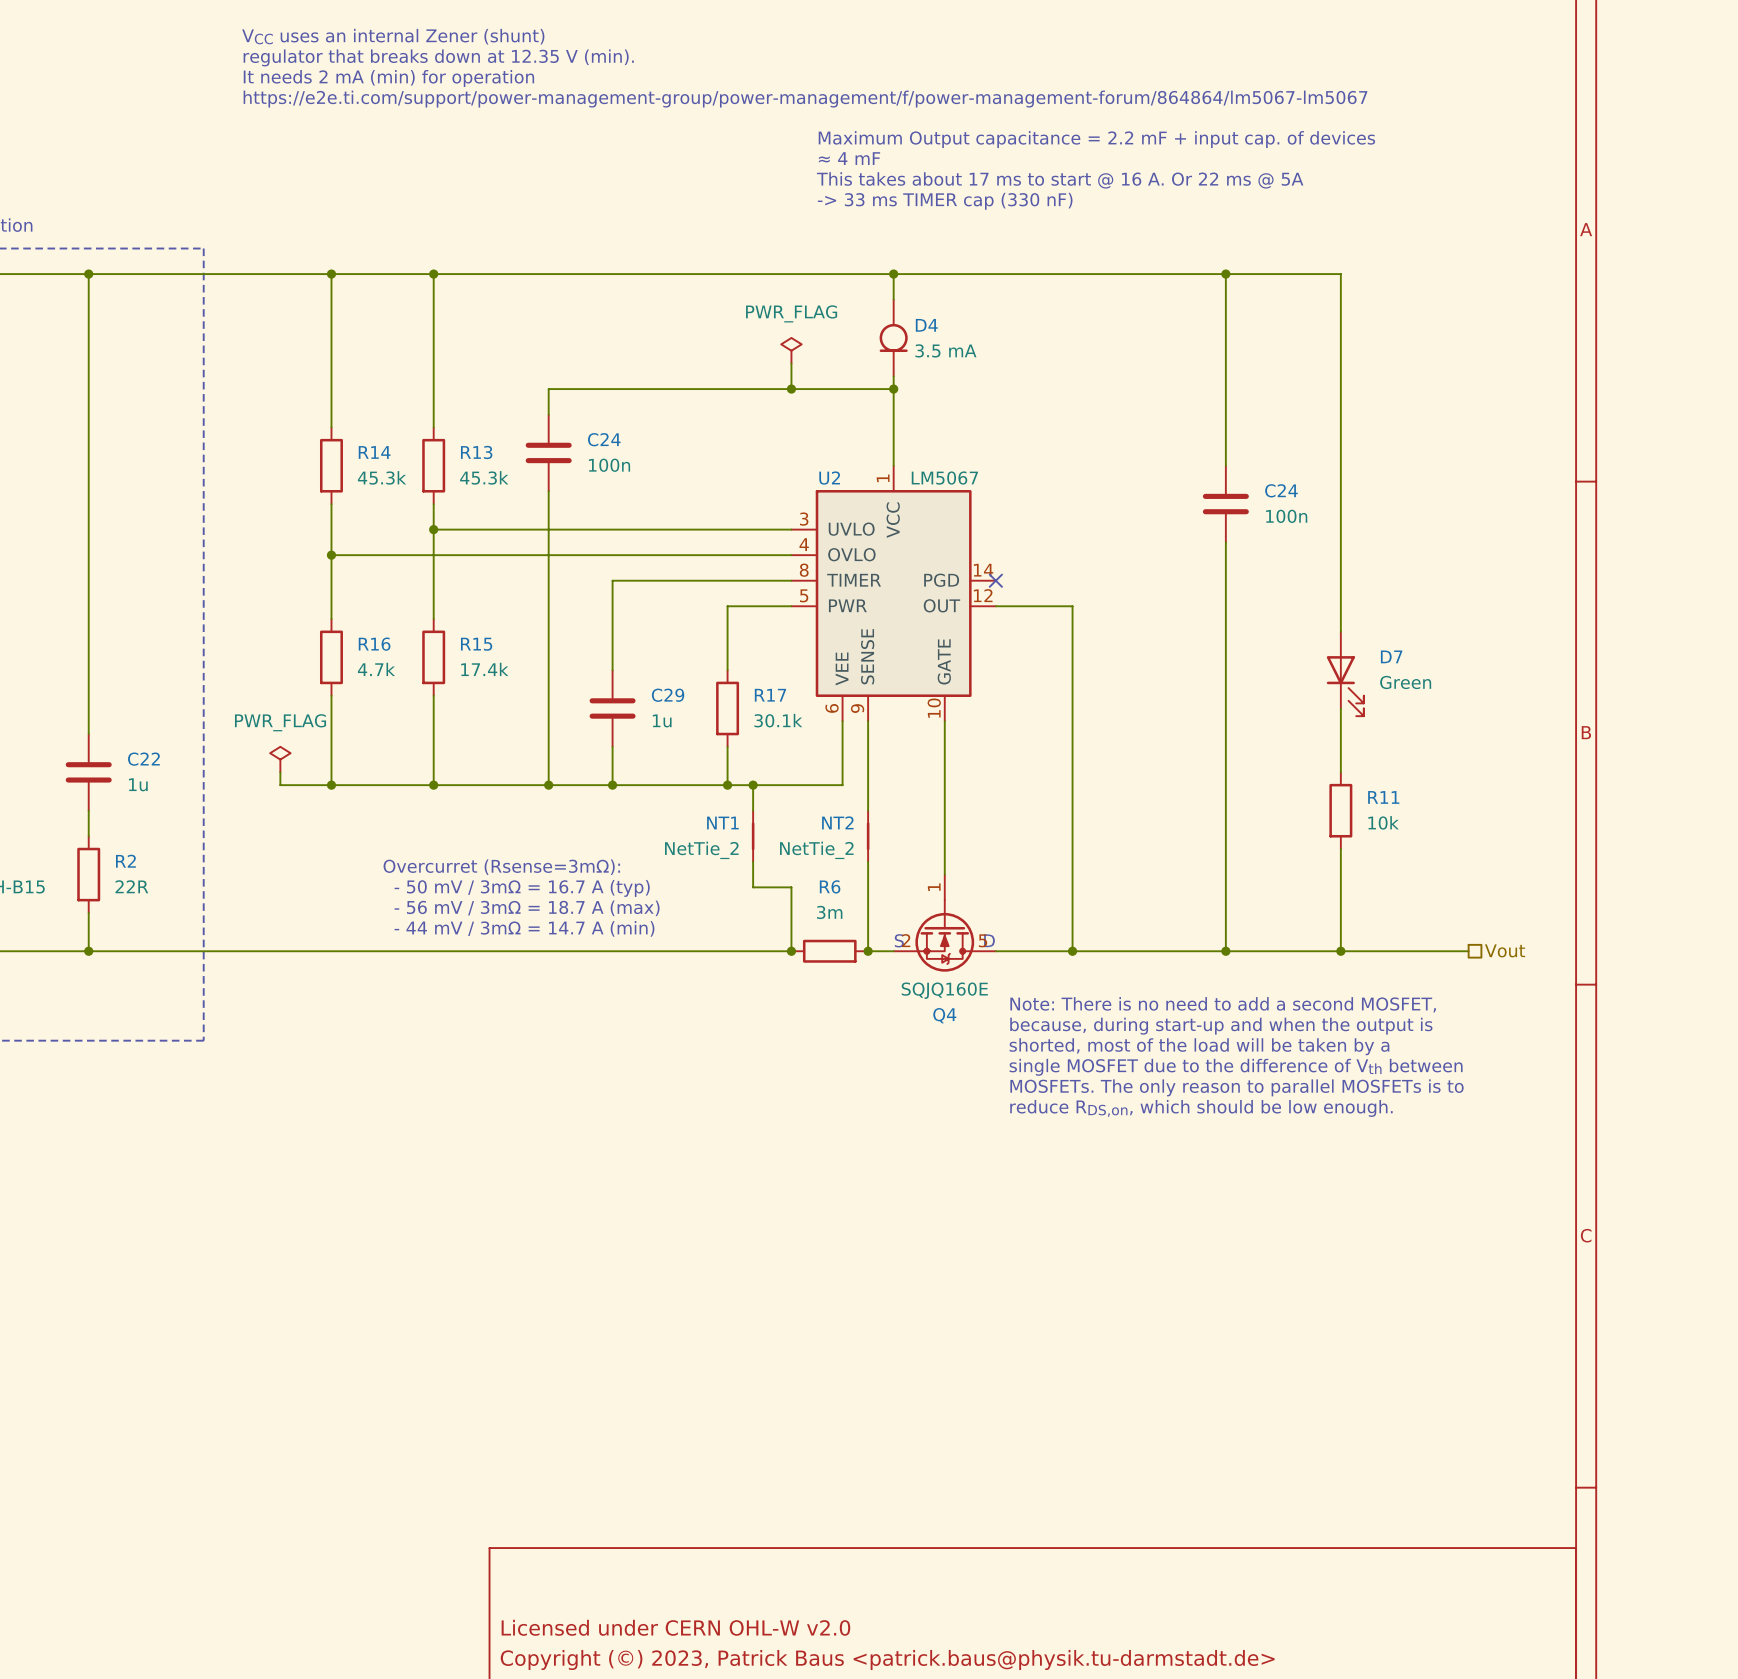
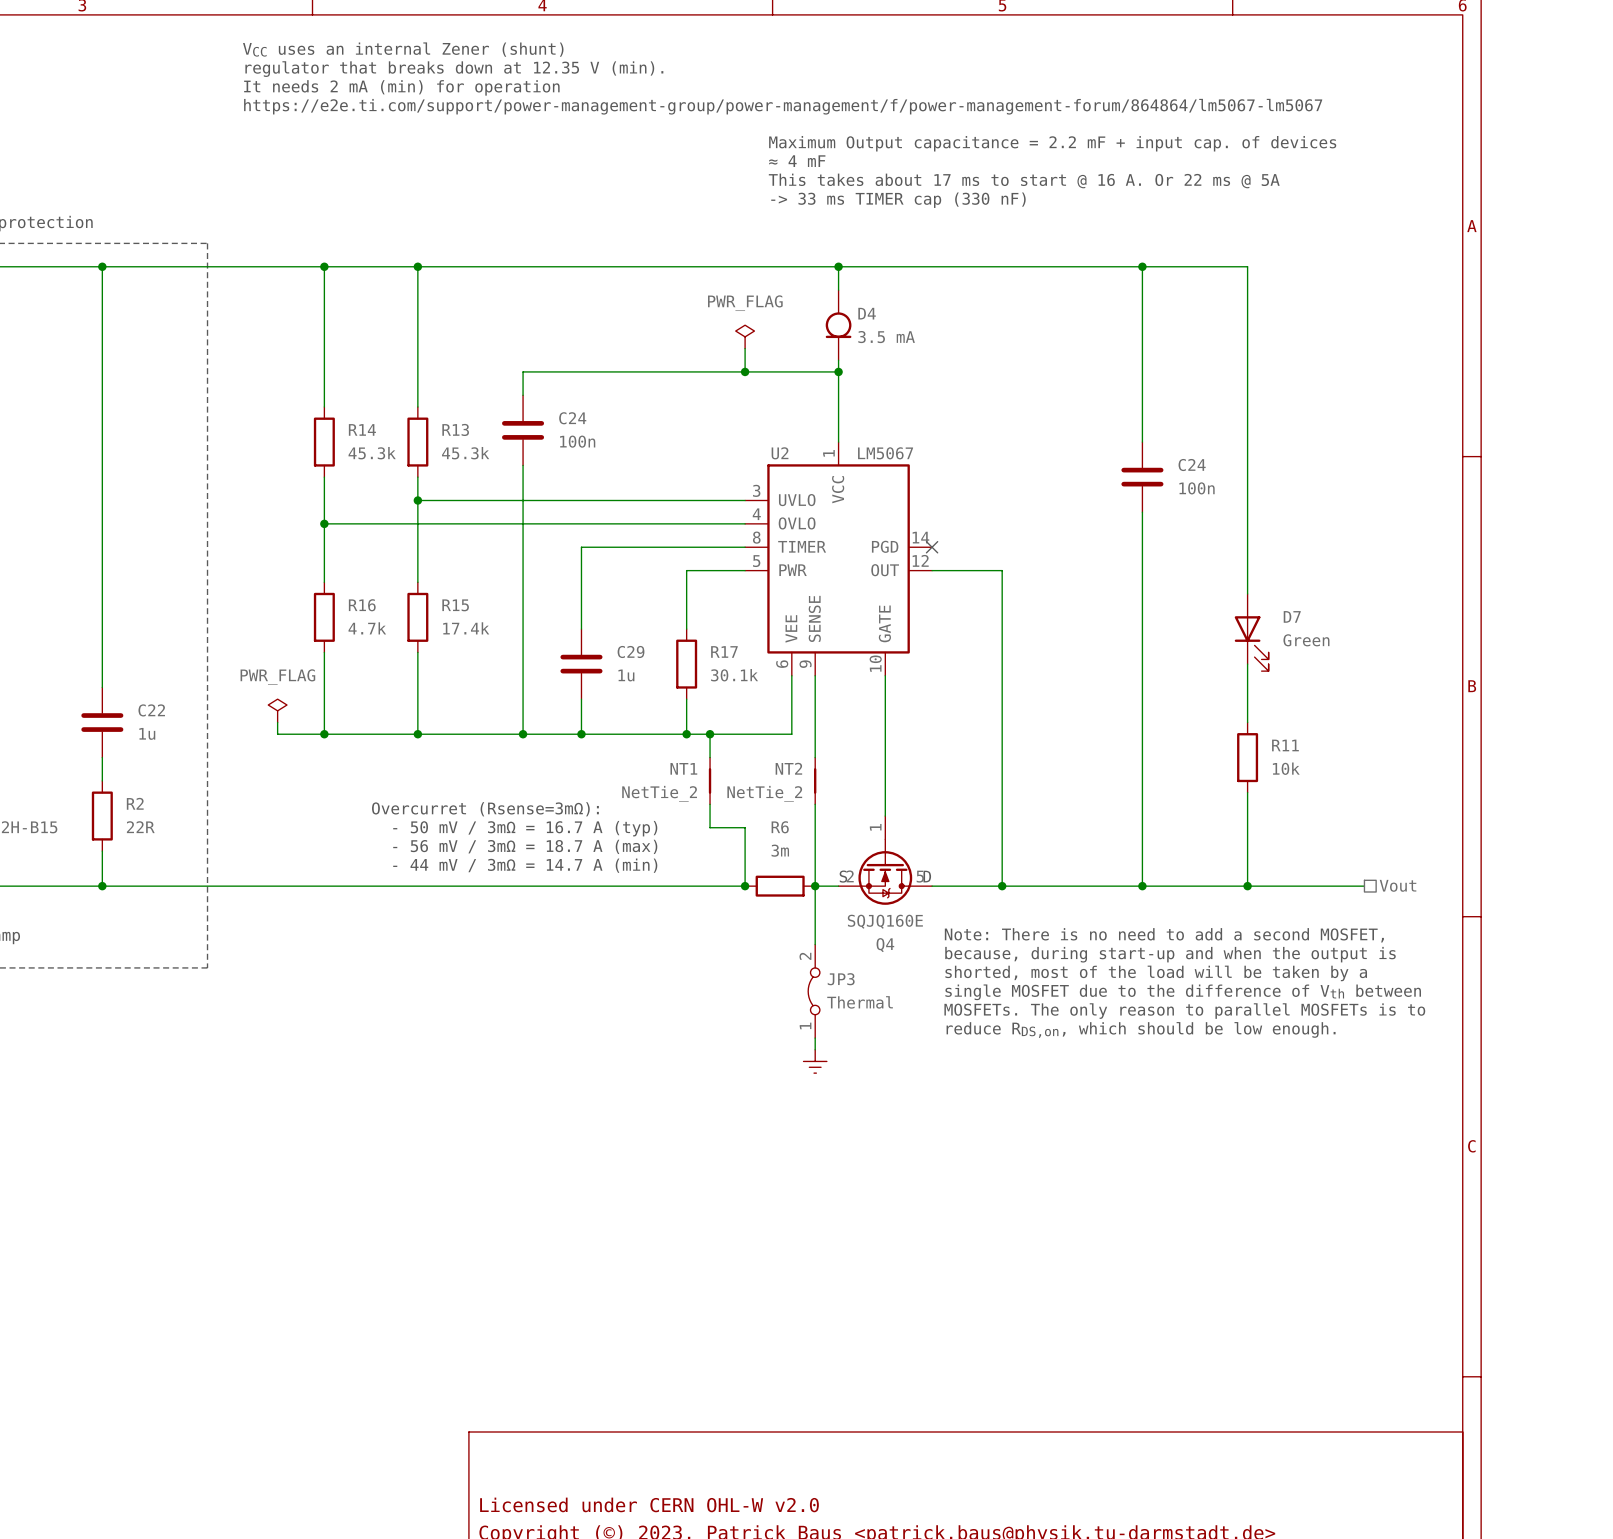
wire: none -> (815, 886) (815, 944)
JP3: none -> Thermal (814, 991)
wire: none -> (815, 1038) (815, 1049)
power symbol: none -> (815, 1061)

